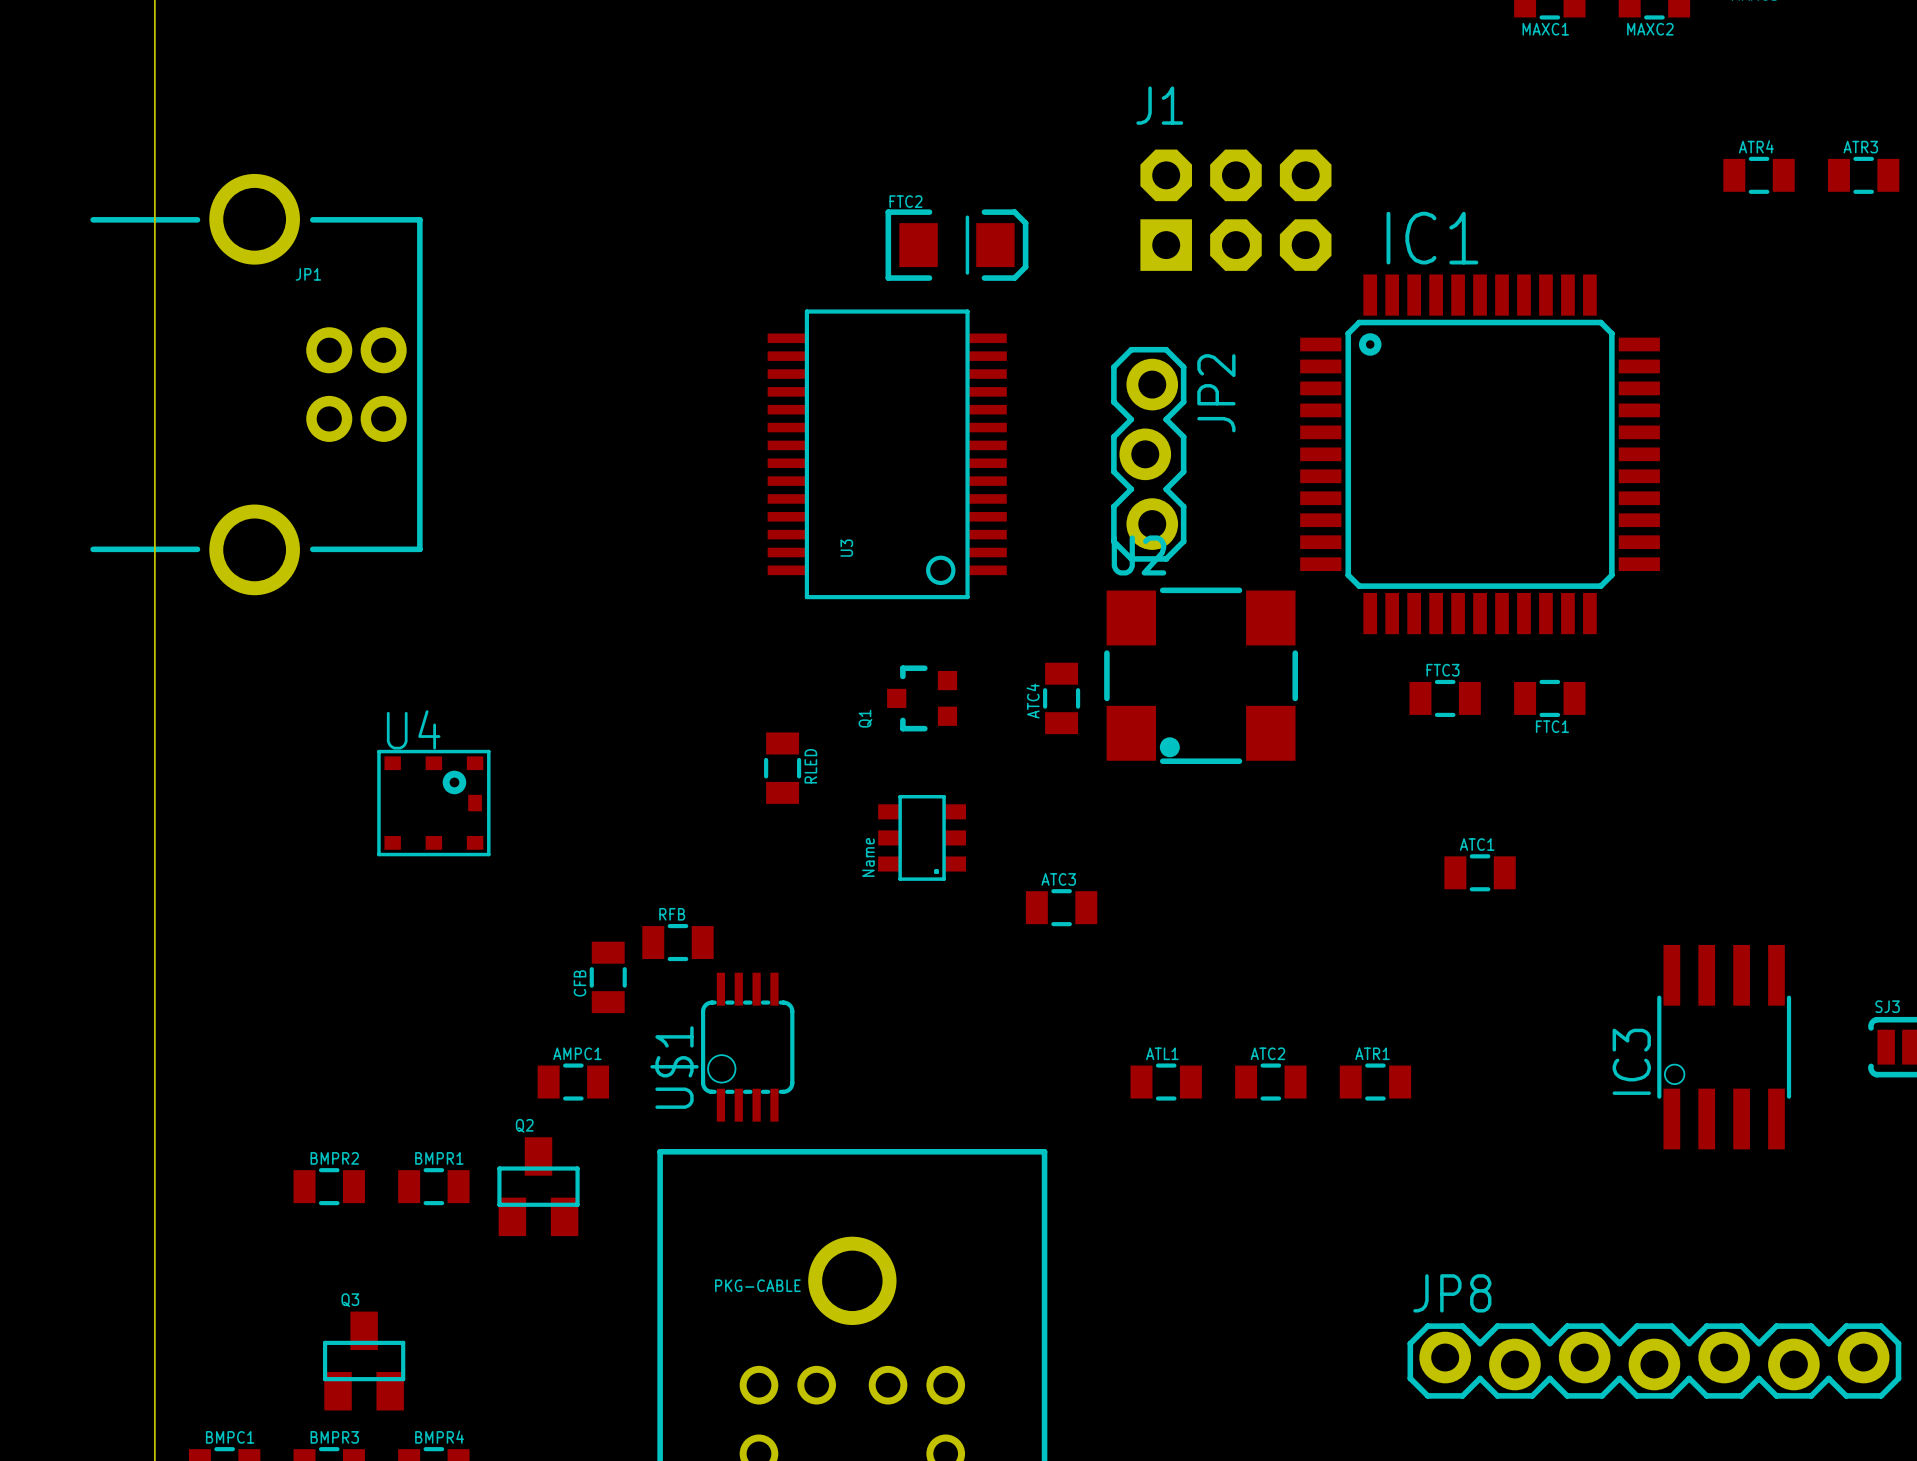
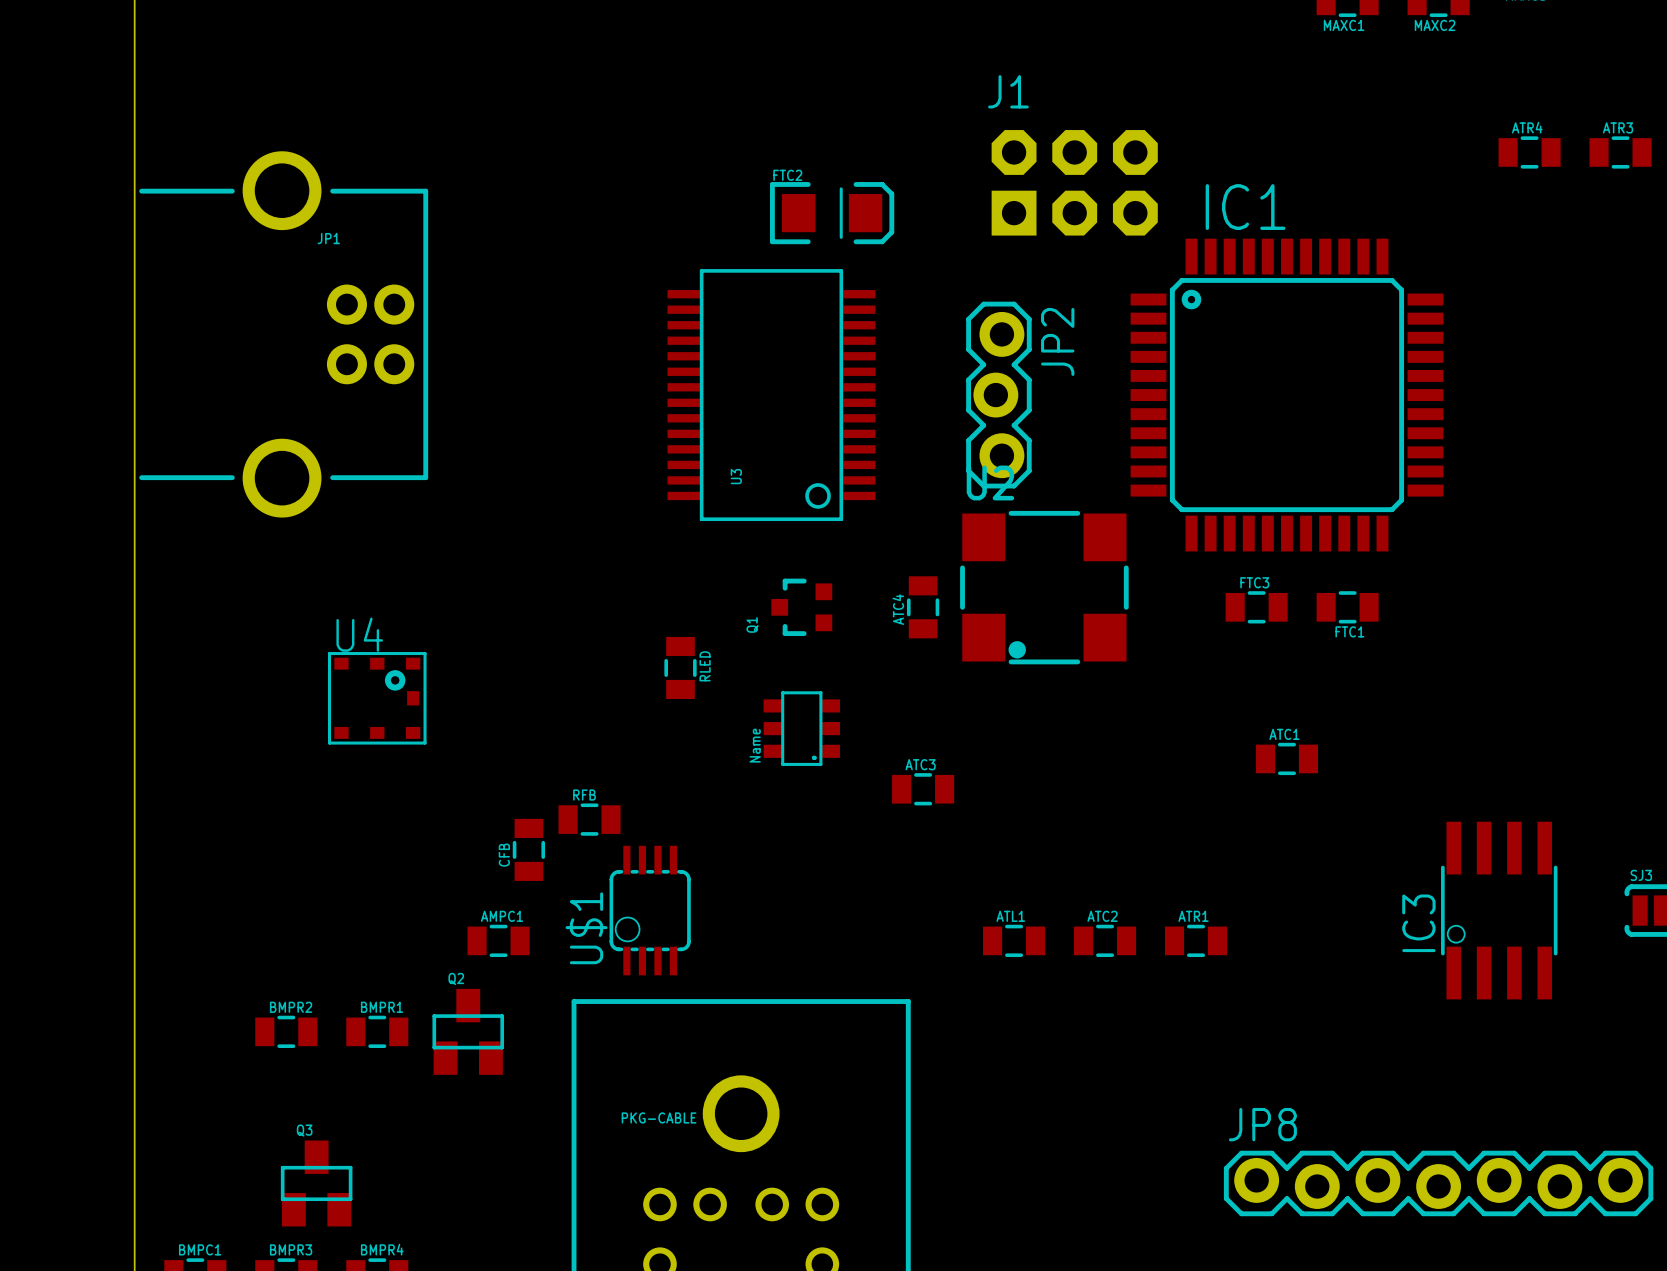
JP1 position: (256, 384) -> (283, 334)

